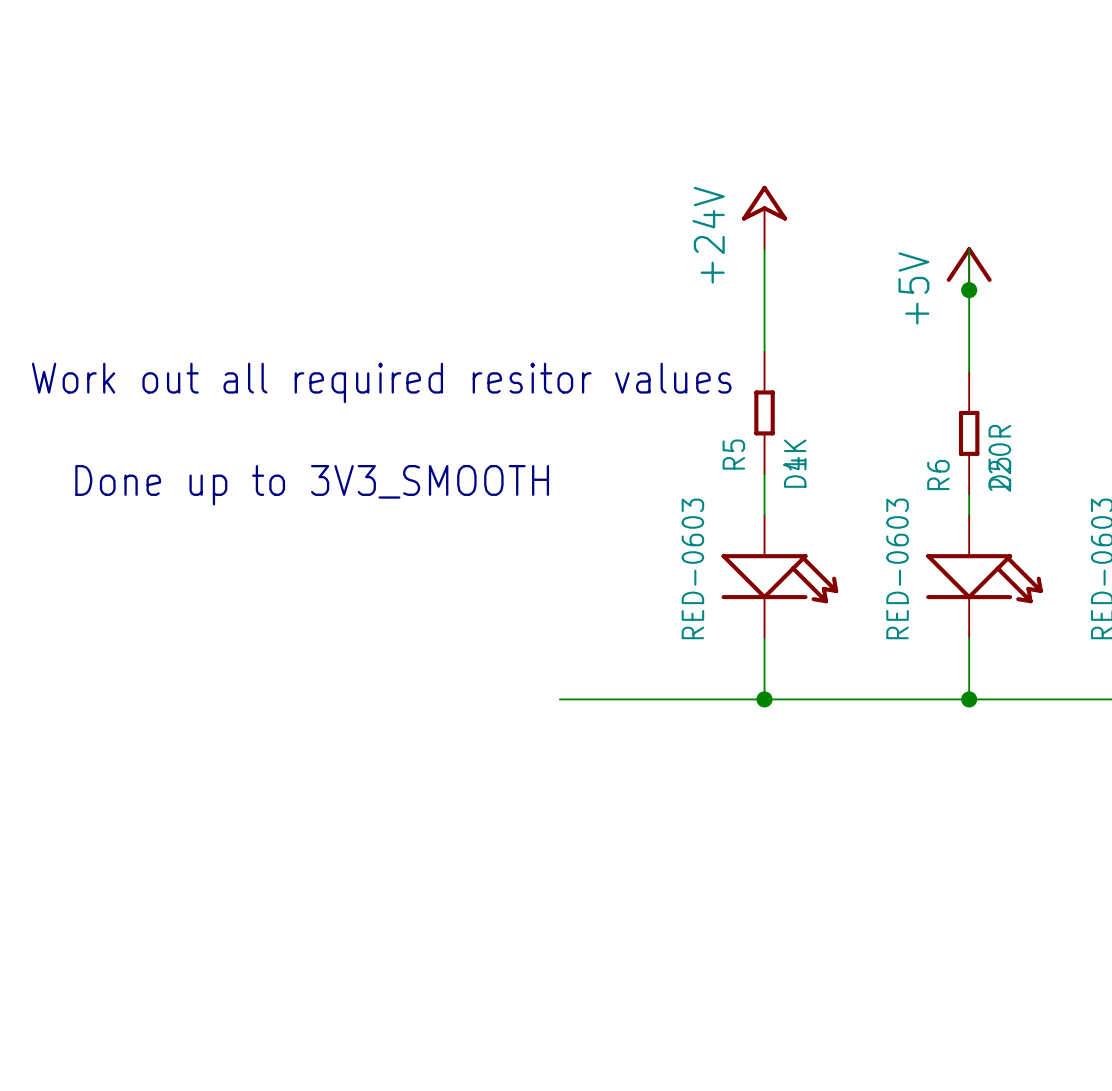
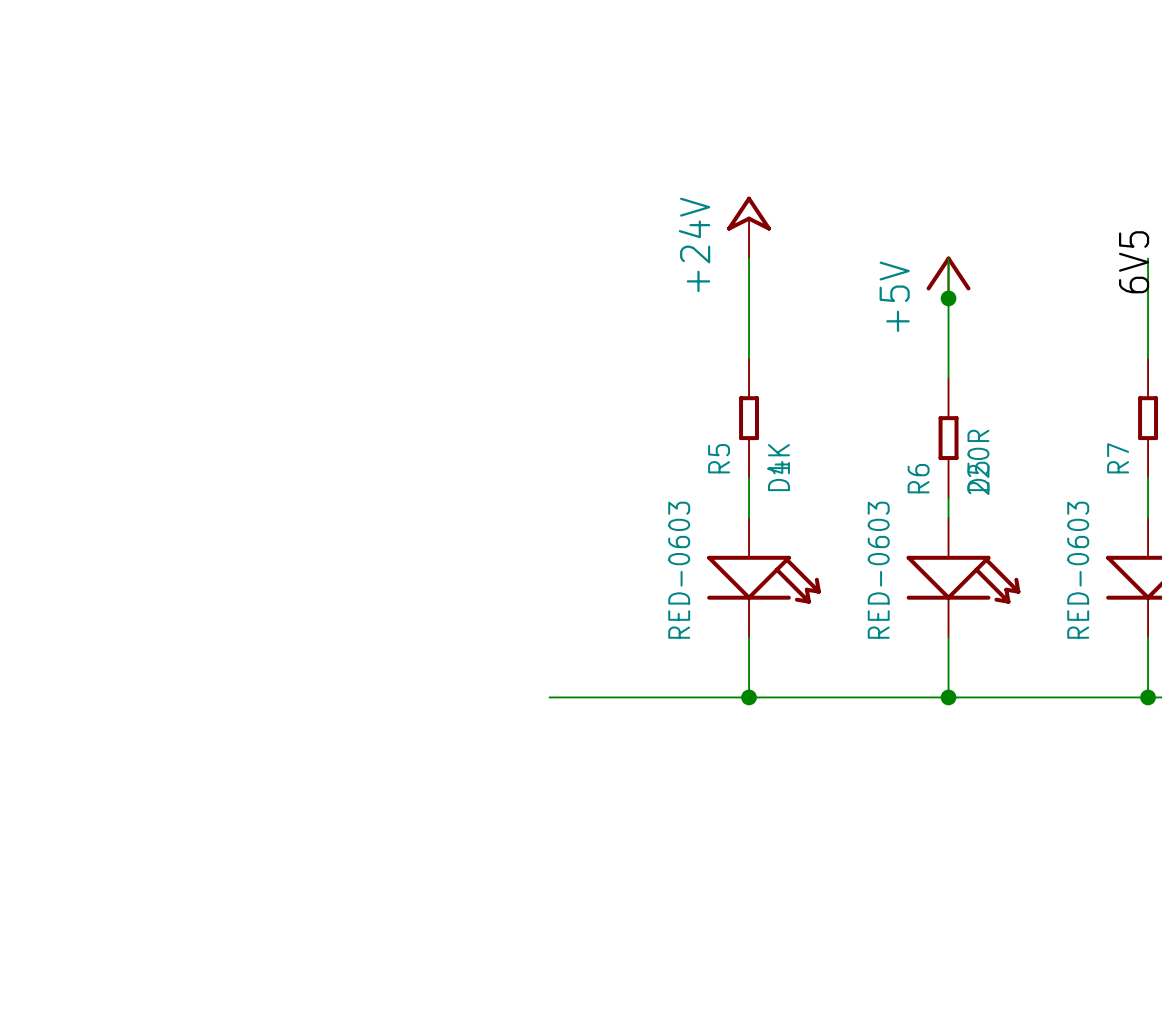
text: Work out all required resitor values (381, 382) -> none
text: Done up to 3V3_SMOOTH (312, 485) -> none

